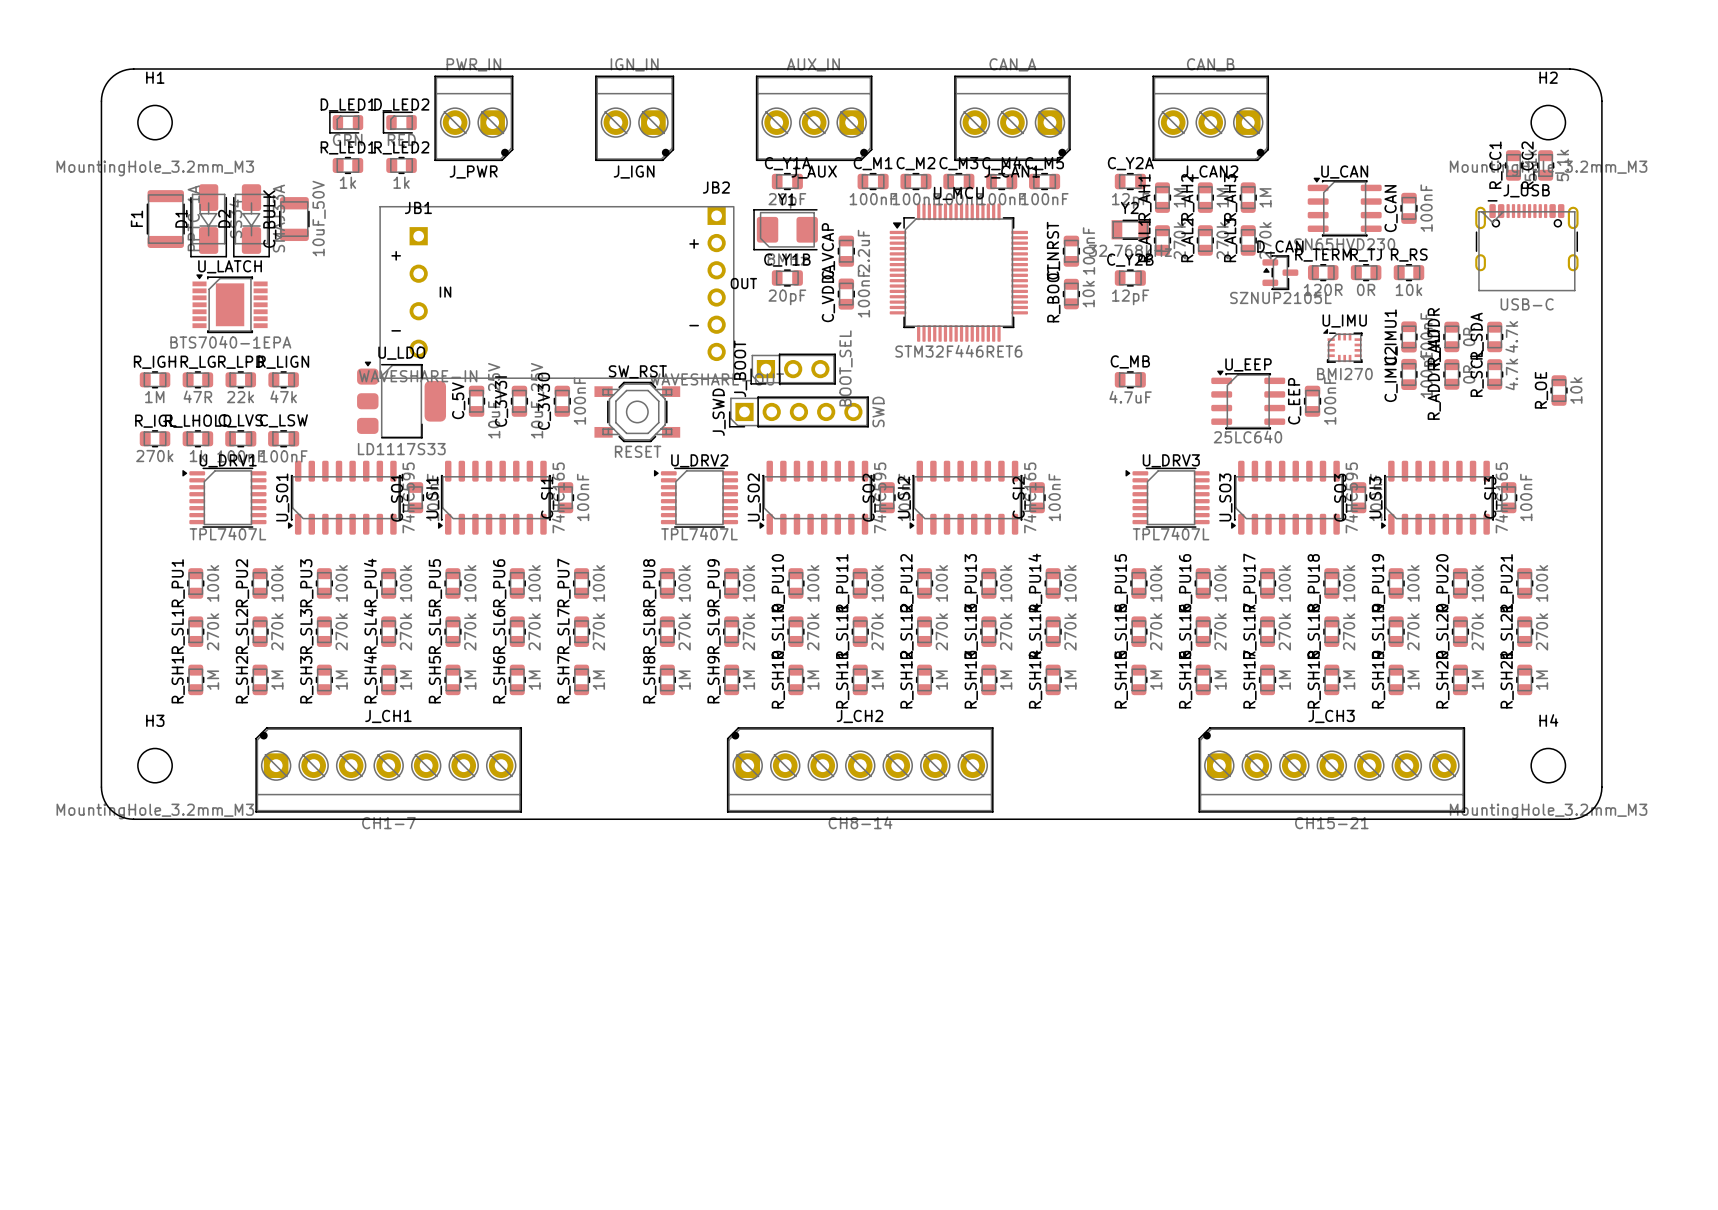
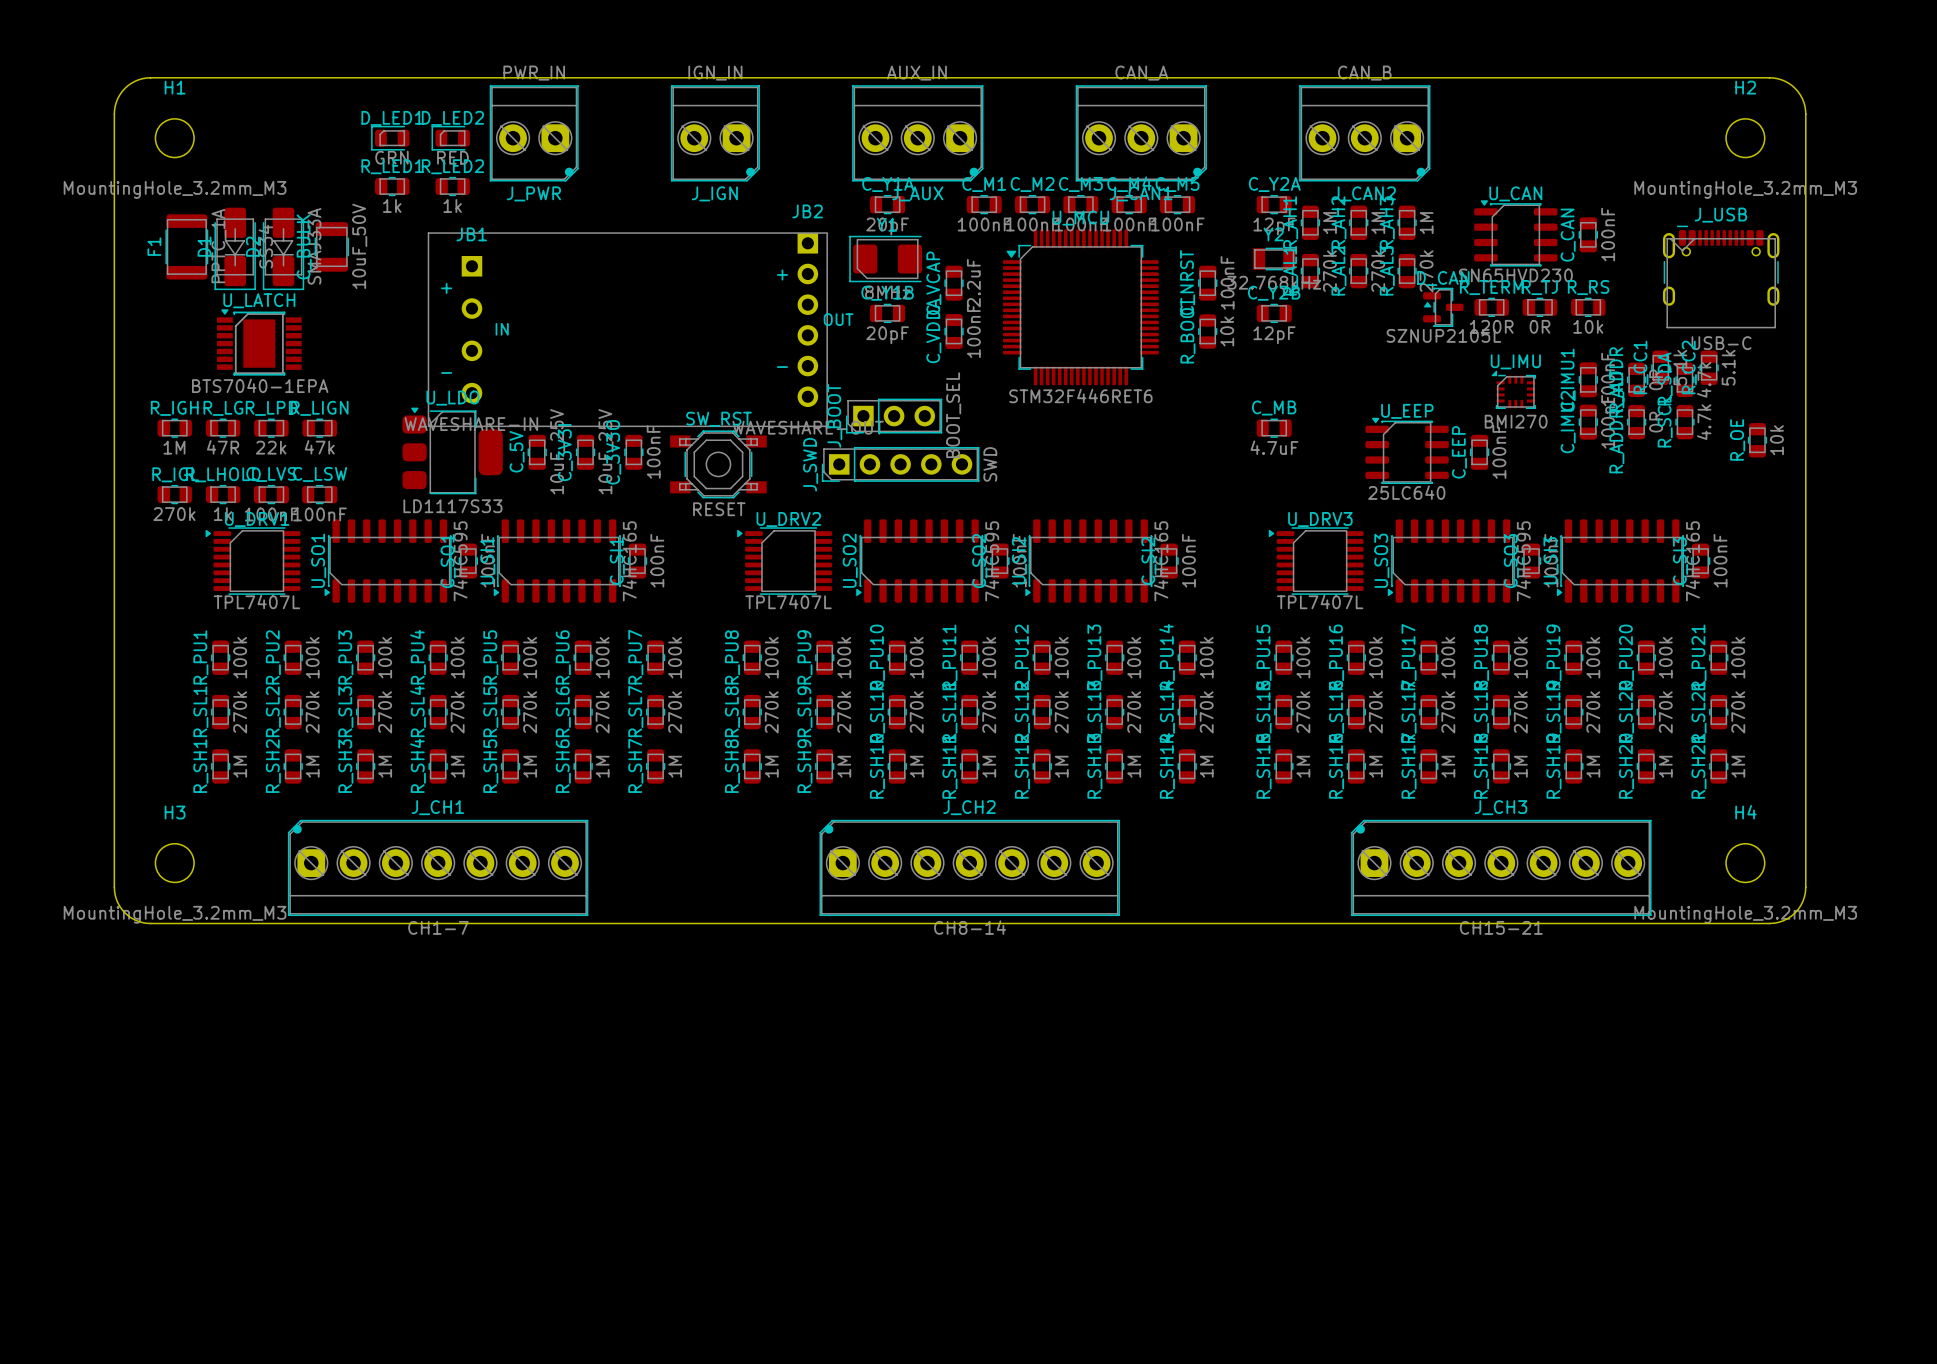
R_CC1 position: (1513, 165) -> (1660, 367)
R_CC2 position: (1545, 165) -> (1709, 367)

